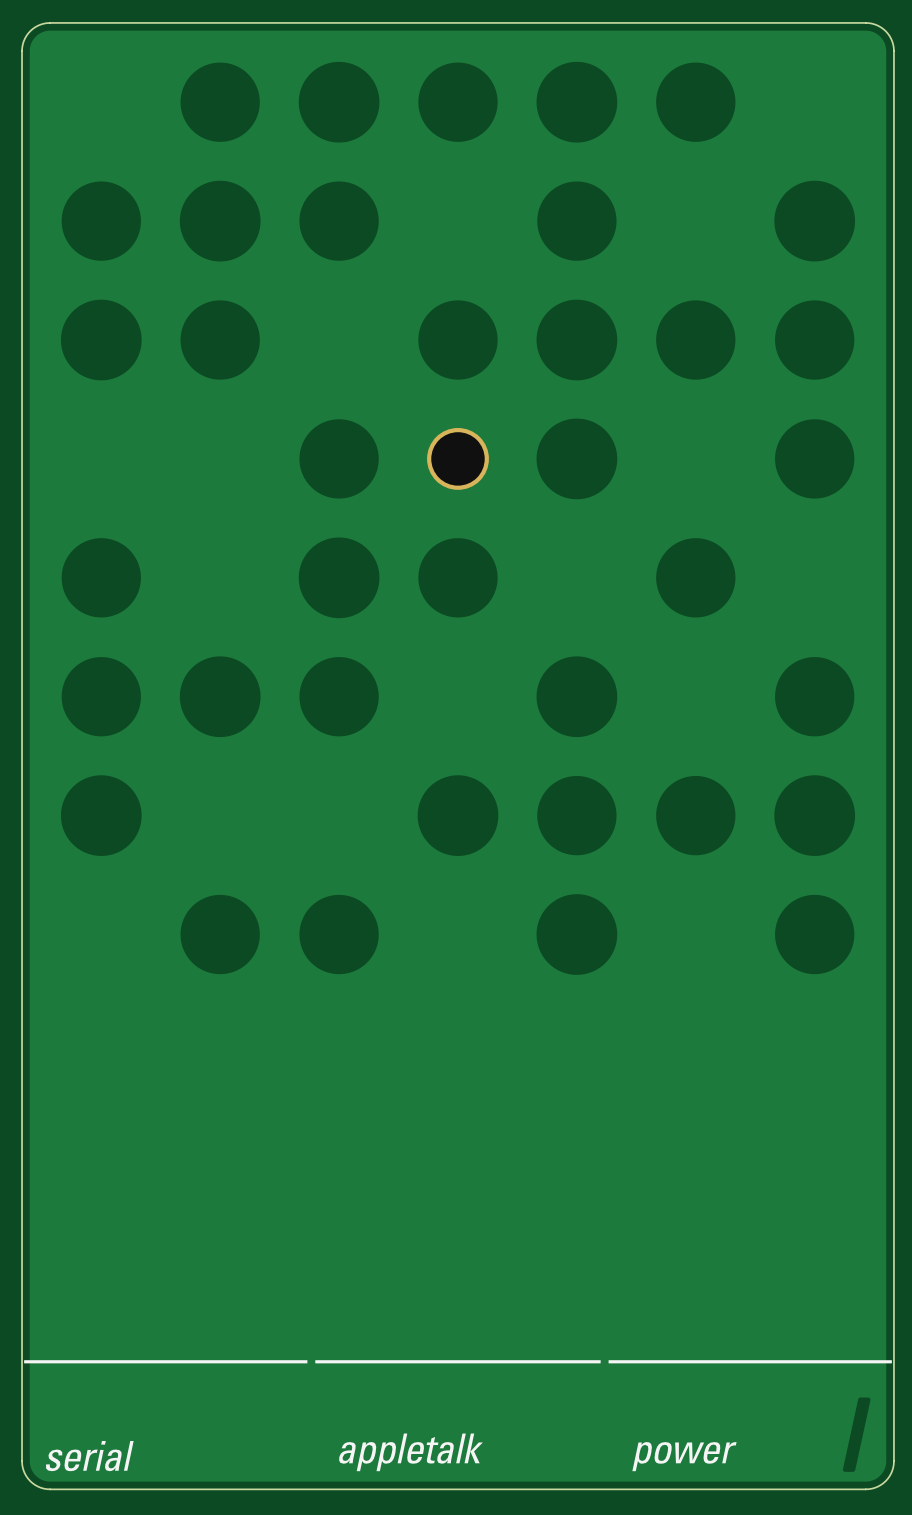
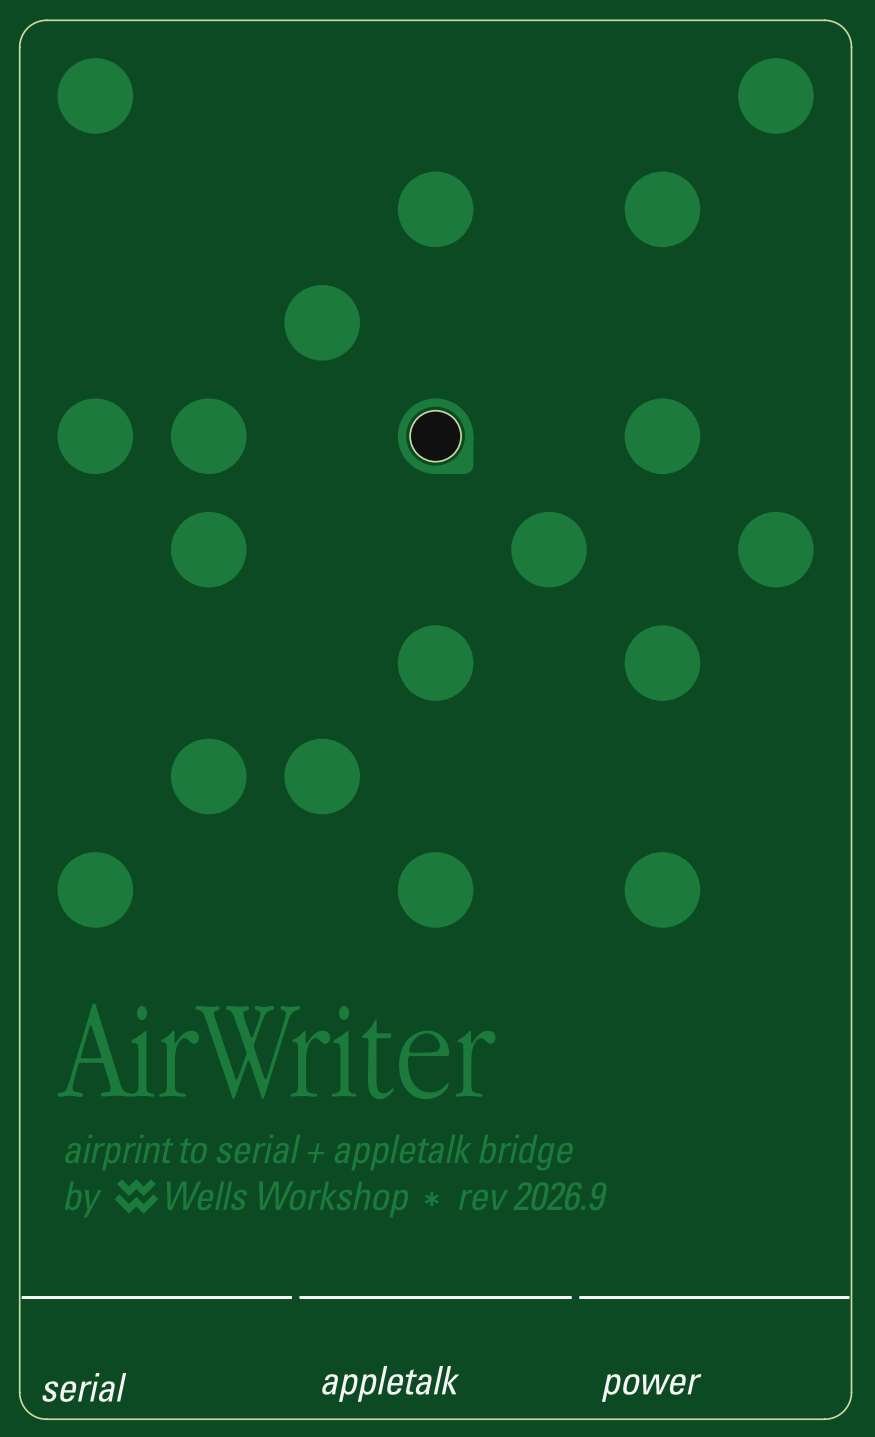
drawing: [29, 30, 887, 1482] -> none
part footprint: [427, 427, 489, 490] -> [410, 410, 462, 462]

